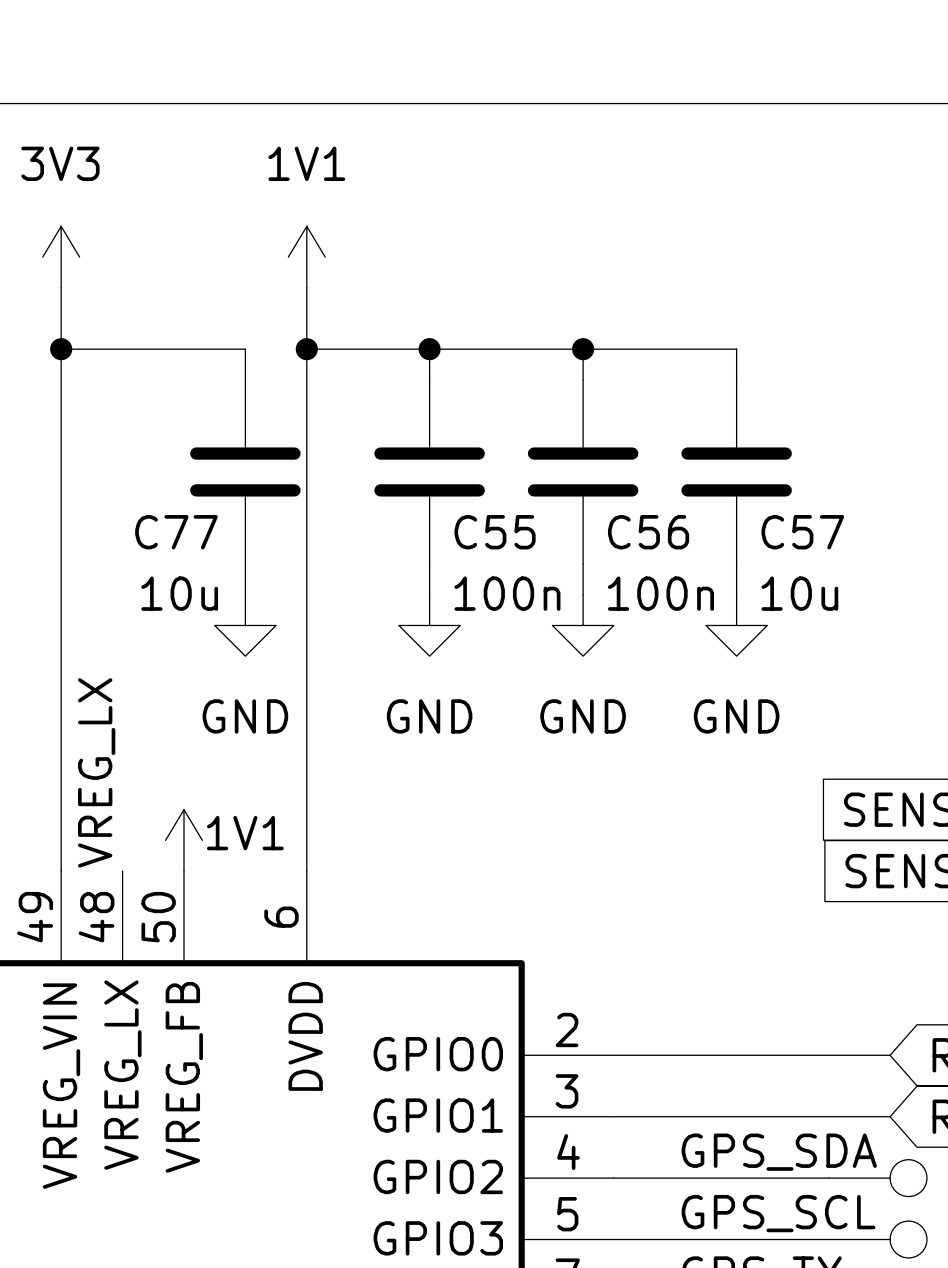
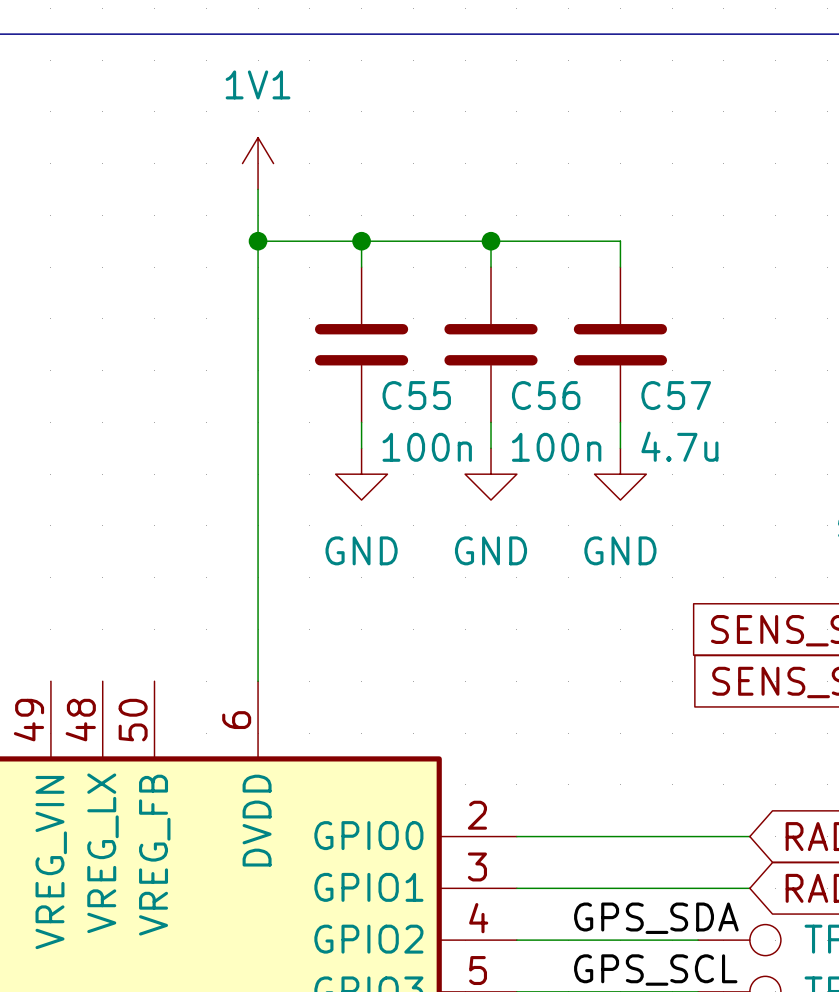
power symbol: 3V3 (61, 257) -> none
wire: (61, 287) (61, 871) -> none
wire: (61, 349) (245, 349) (245, 379) -> none
junction: (61, 349) -> none
C77: 10u (245, 471) -> none
wire: (245, 564) (245, 594) -> none
C57 value: 10u (799, 593) -> 4.7u (679, 446)
power symbol: GND (245, 625) -> none
label: VREG_LX (96, 772) -> none
power symbol: 1V1 (183, 840) -> none

